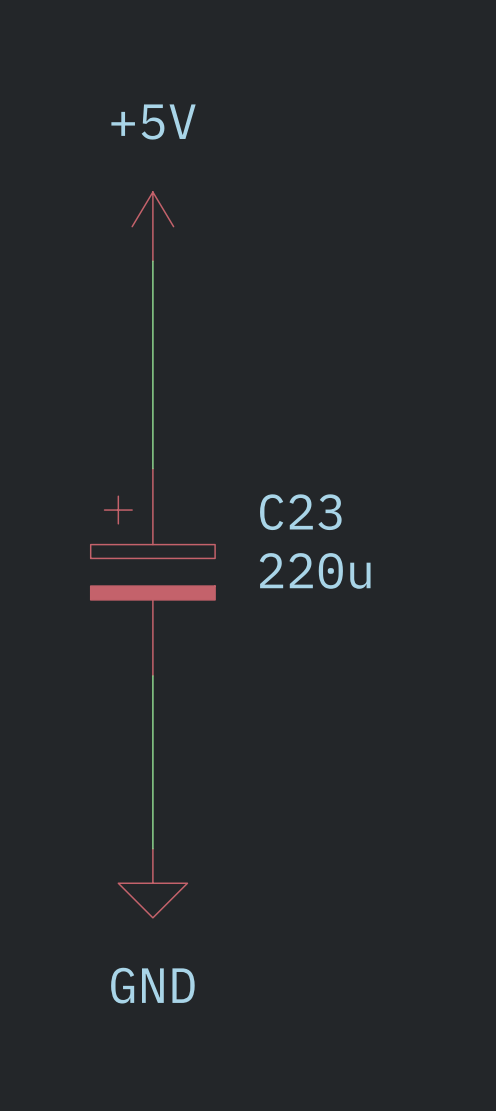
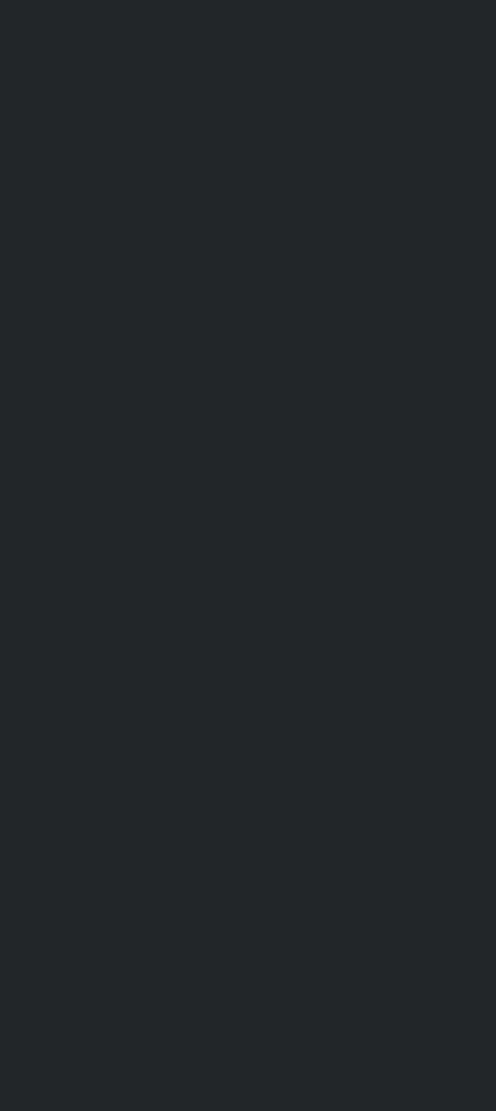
power symbol: +5V (152, 226) -> none
wire: (152, 261) (152, 468) -> none
C23: 220u (152, 572) -> none
wire: (152, 675) (152, 848) -> none
power symbol: GND (152, 883) -> none

